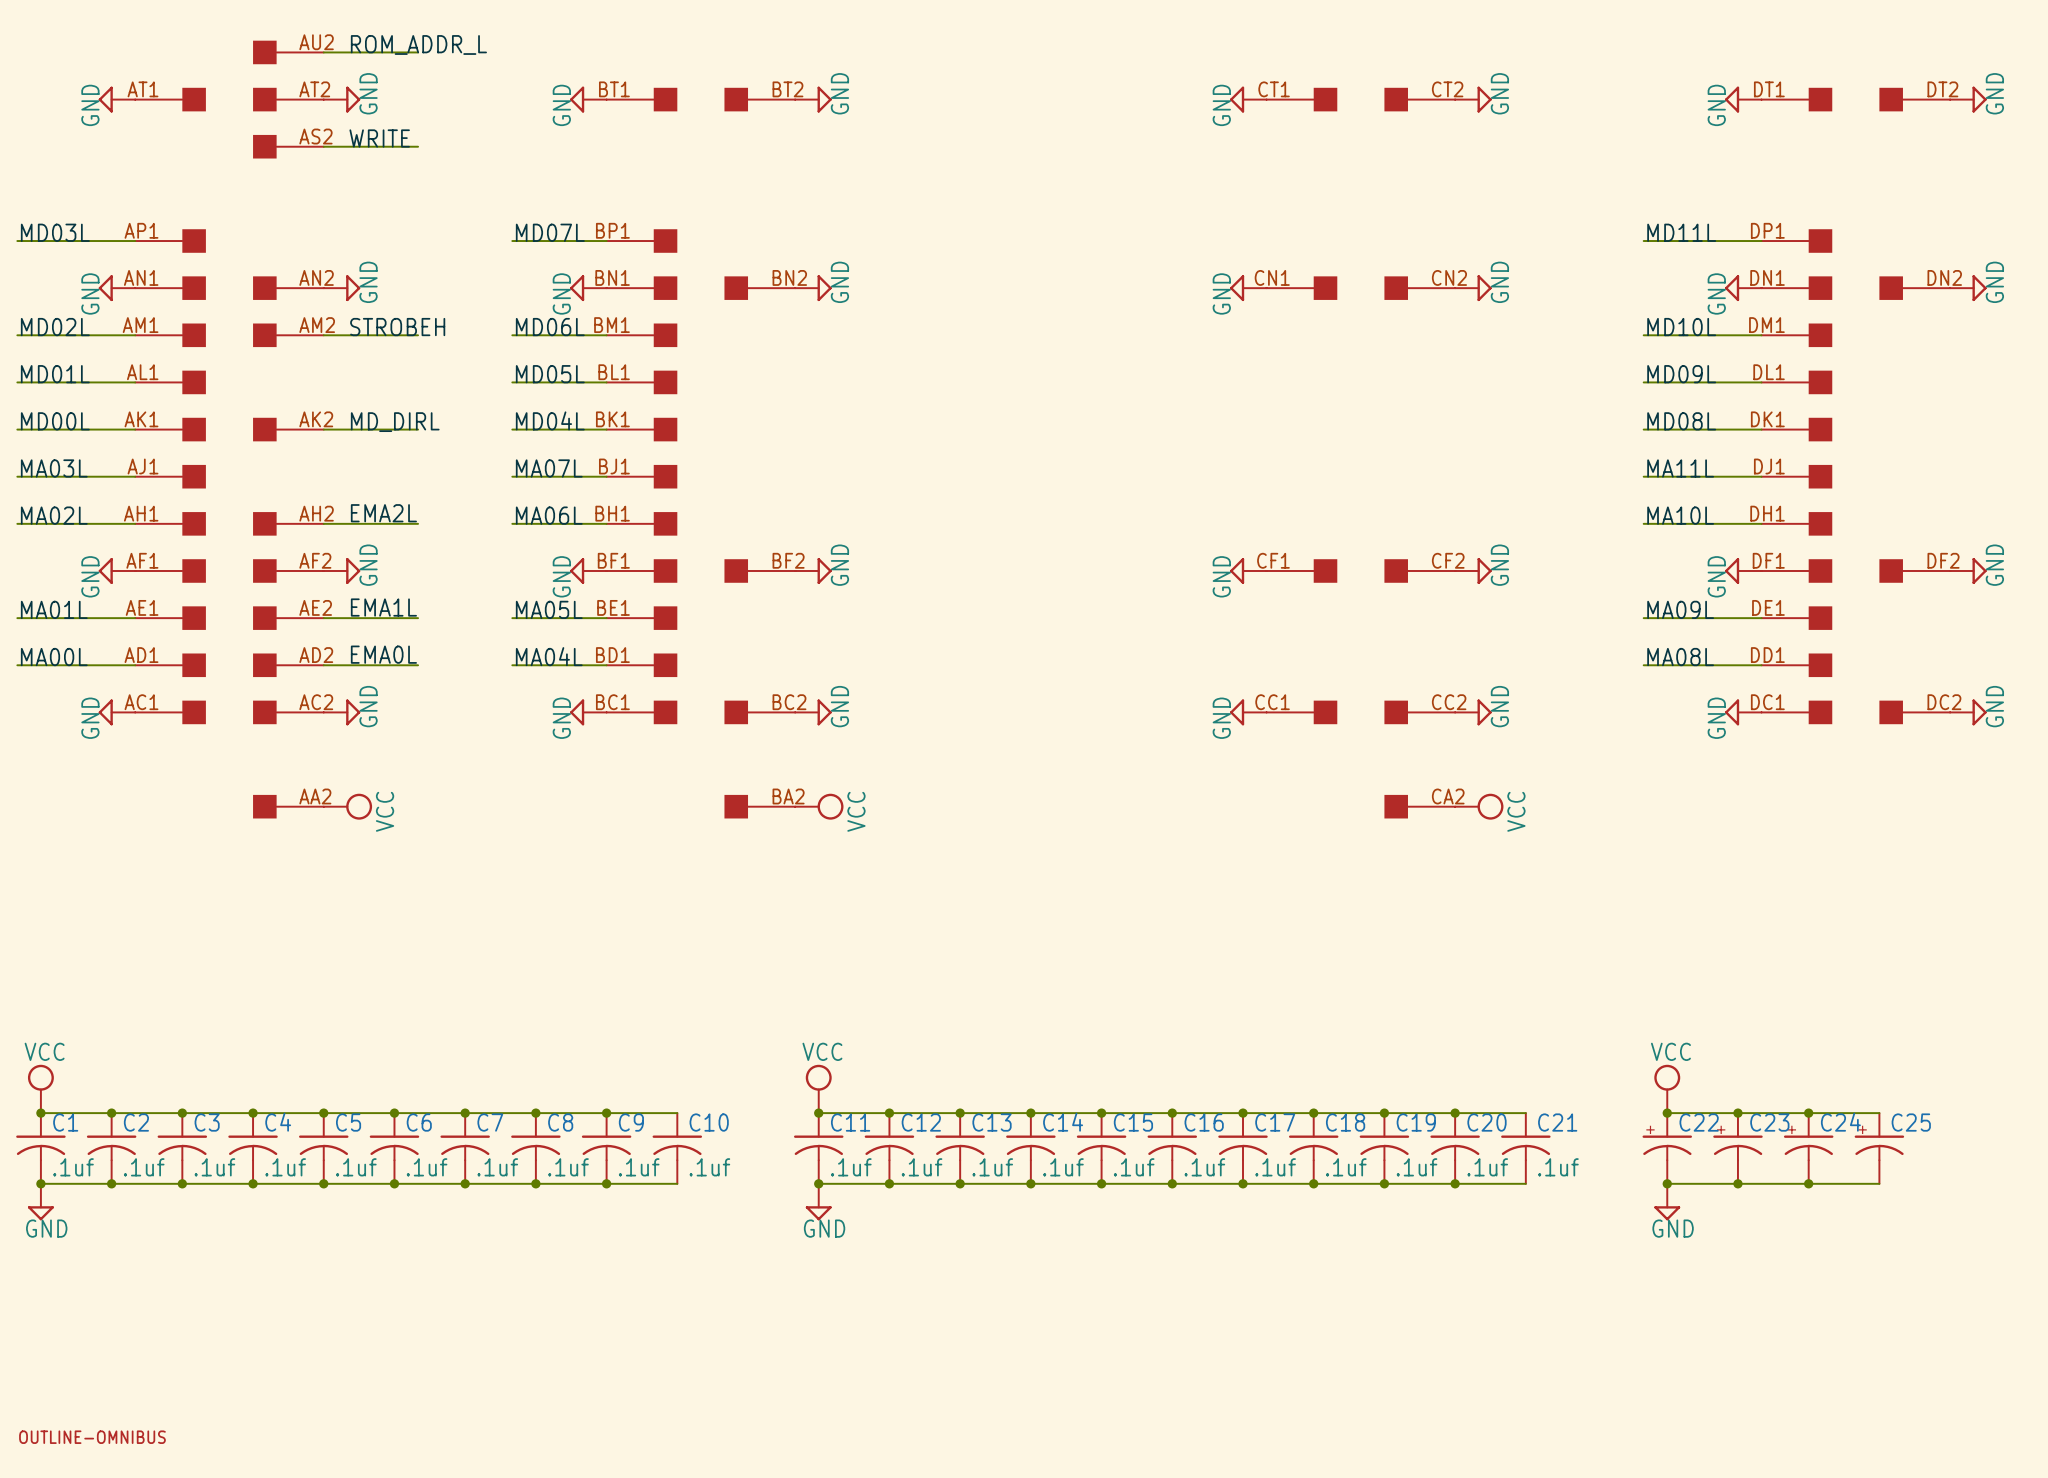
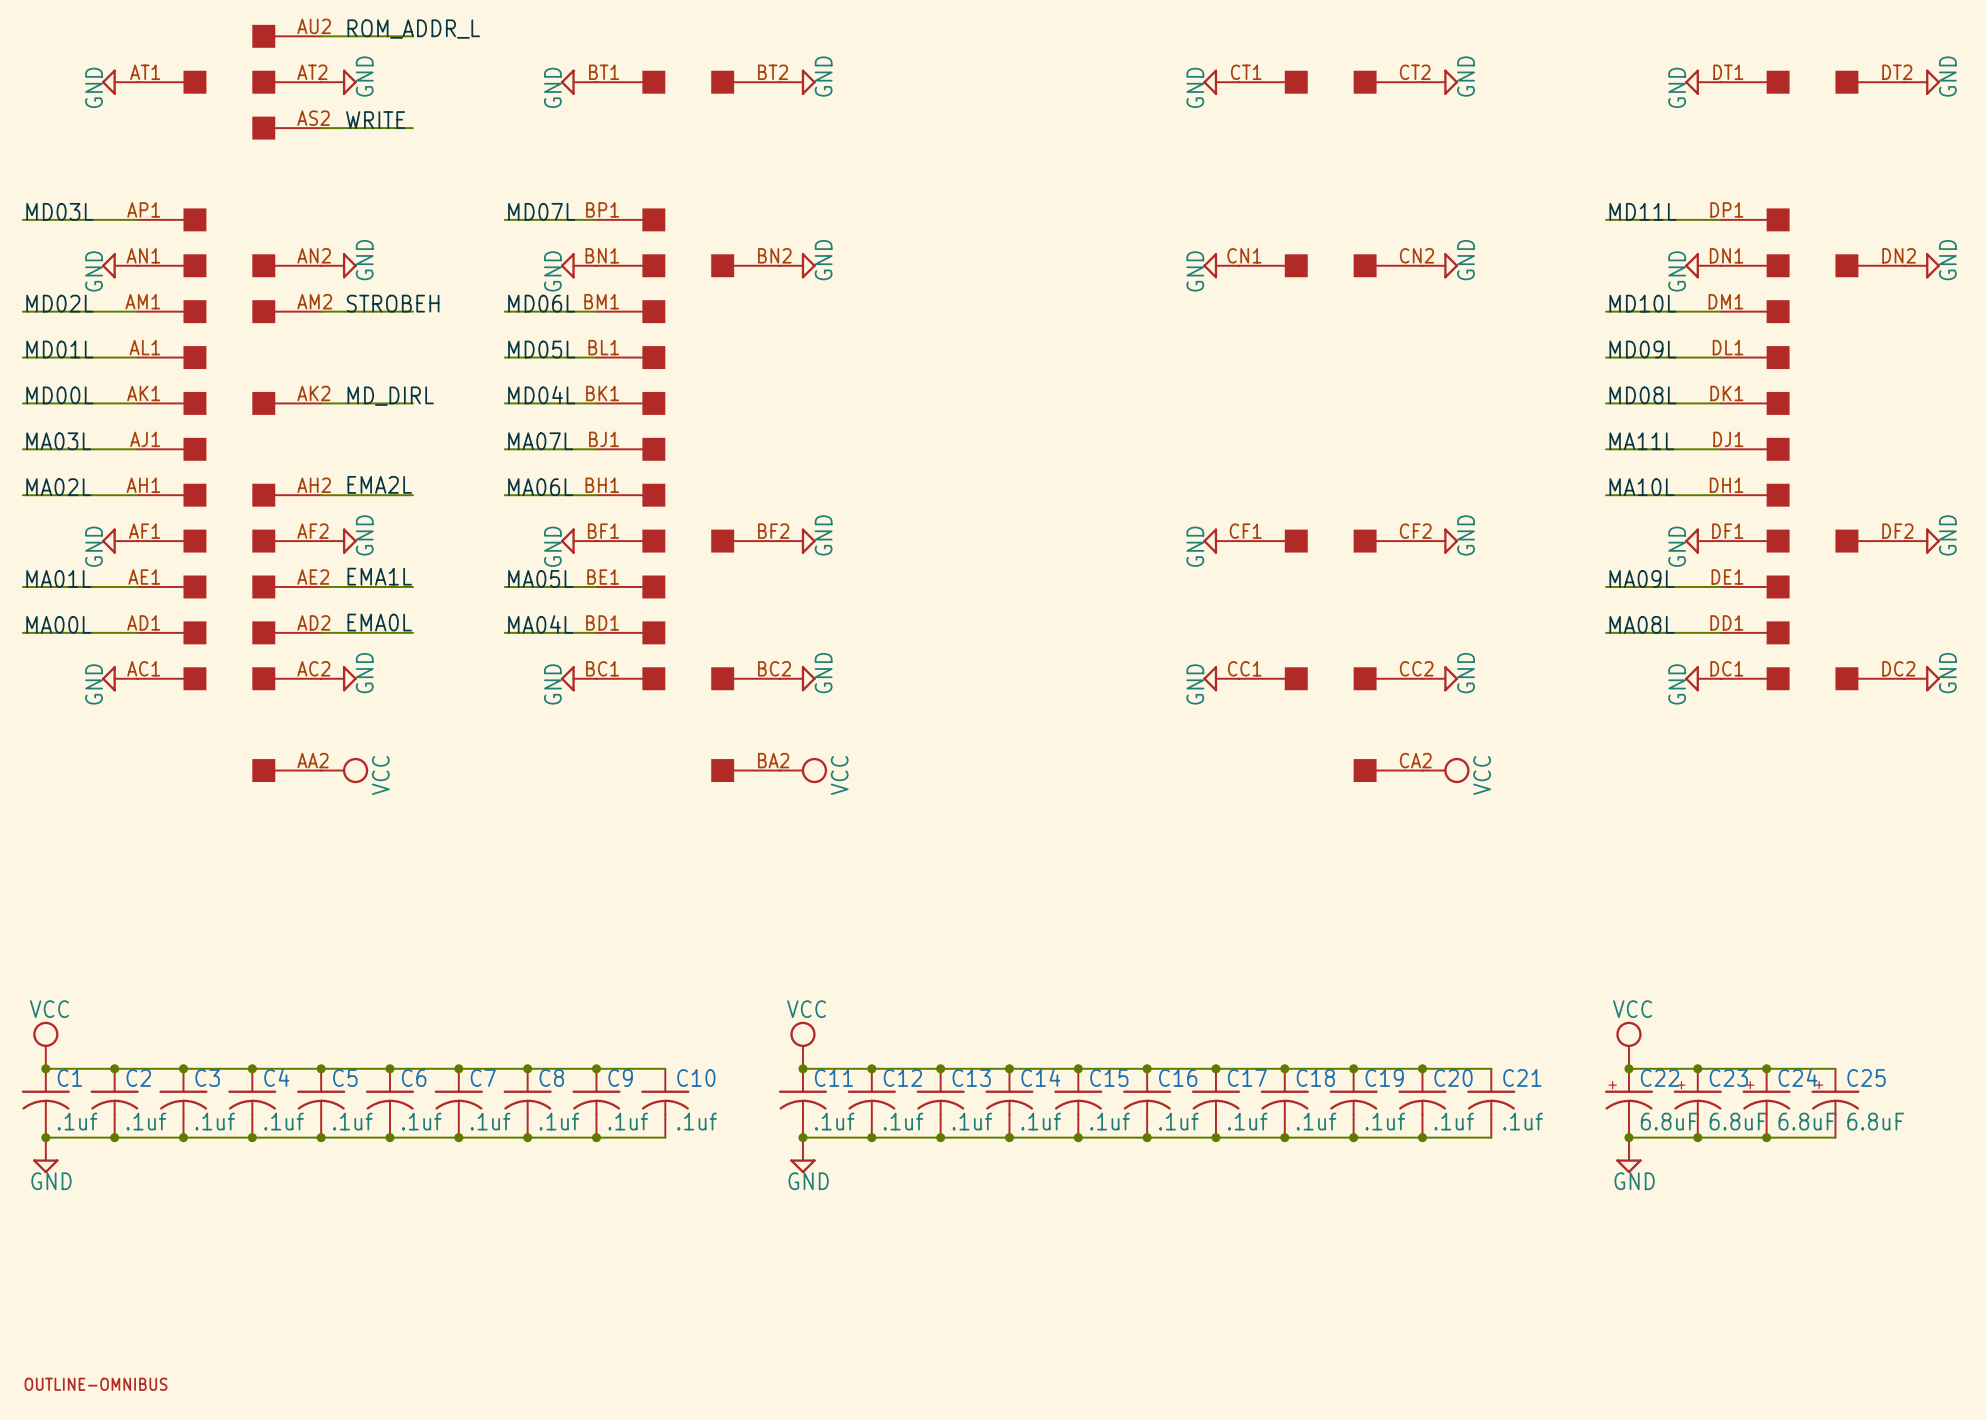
C22 value: none -> 6.8uF (1669, 1121)
C23 value: none -> 6.8uF (1738, 1121)
C24 value: none -> 6.8uF (1806, 1121)
C25 value: none -> 6.8uF (1875, 1121)

